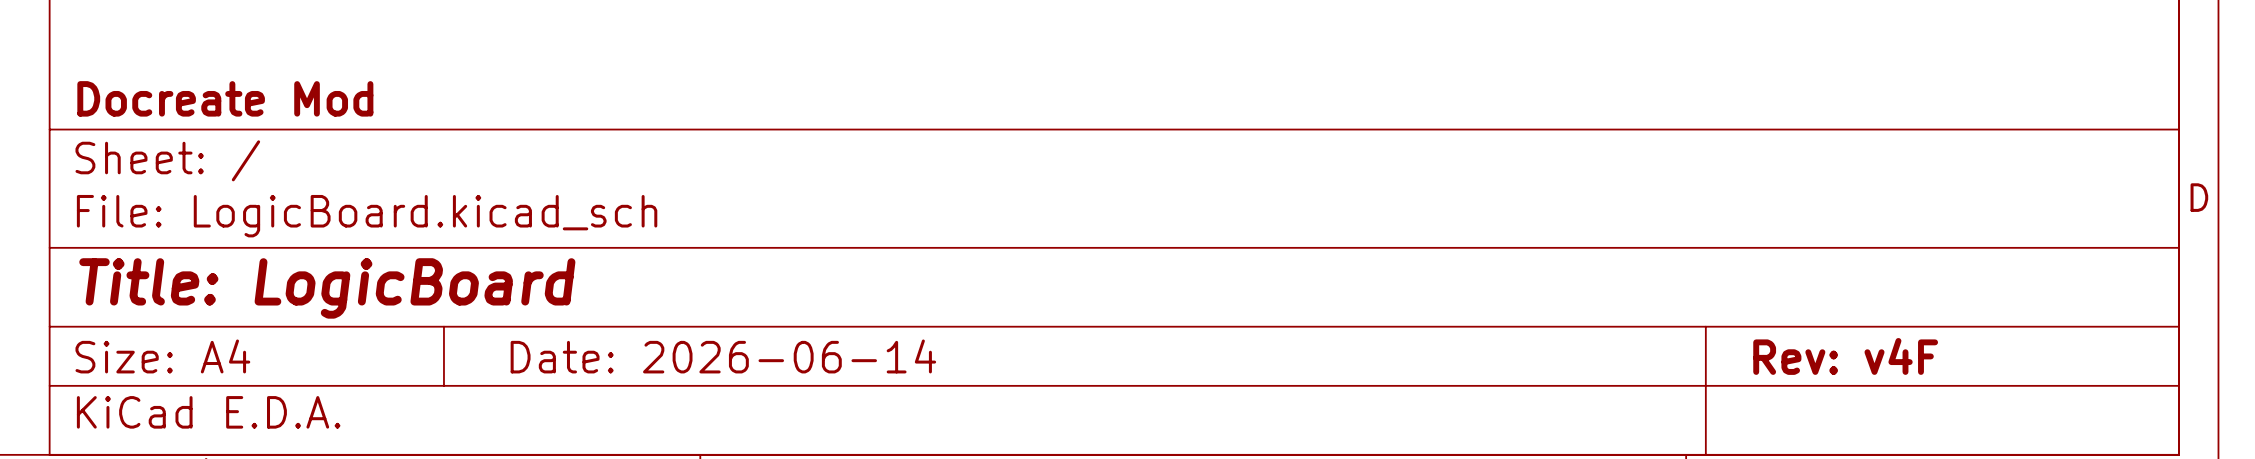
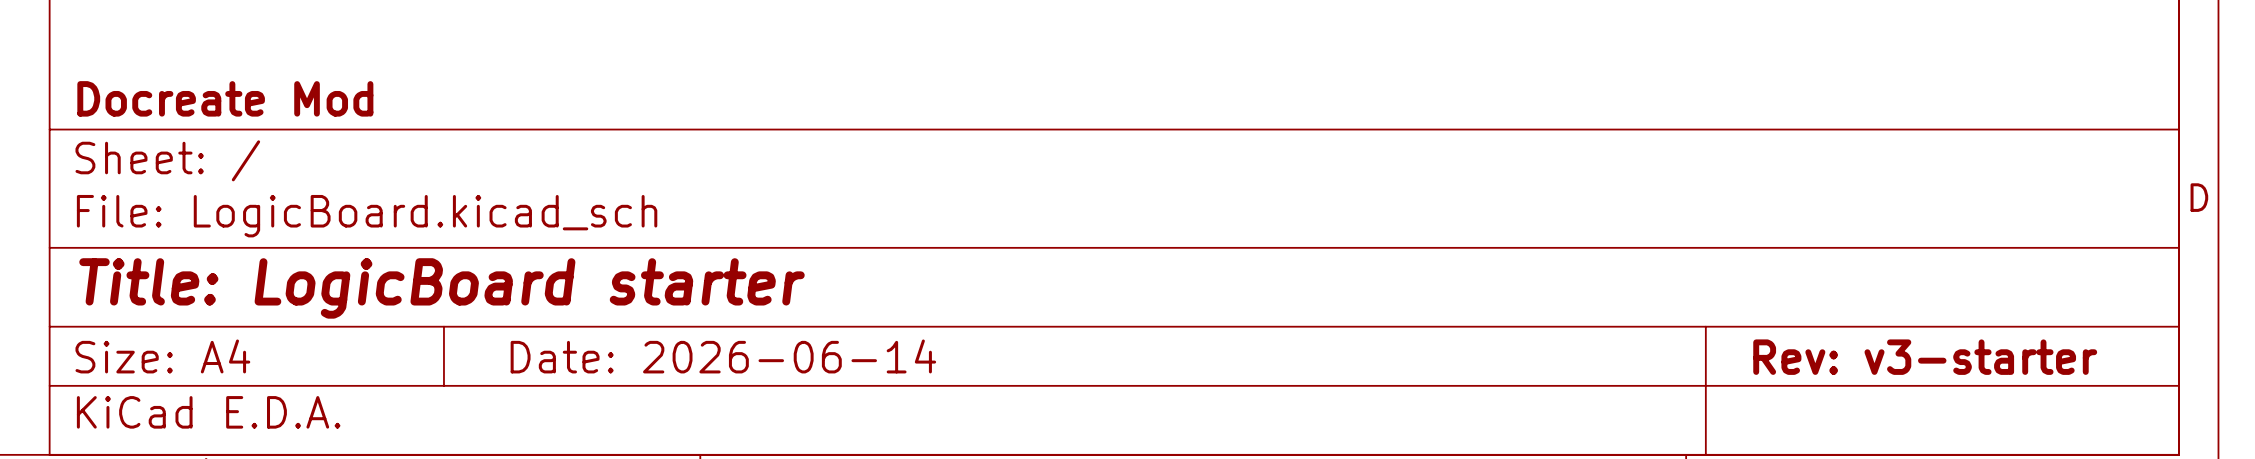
title block: Title: LogicBoard (327, 288) -> Title: LogicBoard starter (442, 288)
title block: Rev: v4F (1845, 356) -> Rev: v3-starter (1925, 357)

